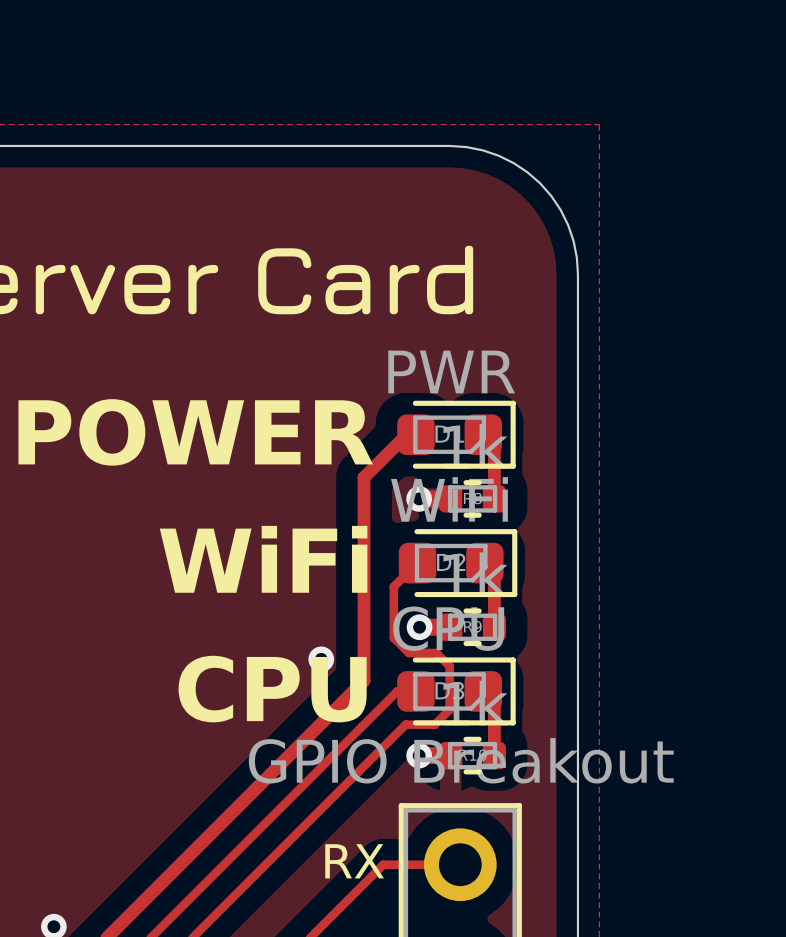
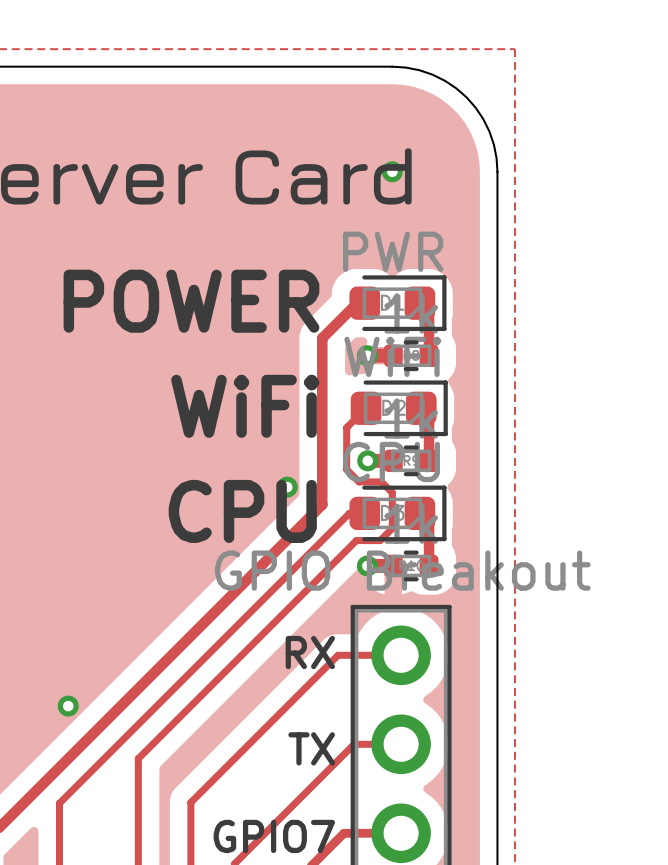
via: none -> (392, 171)

